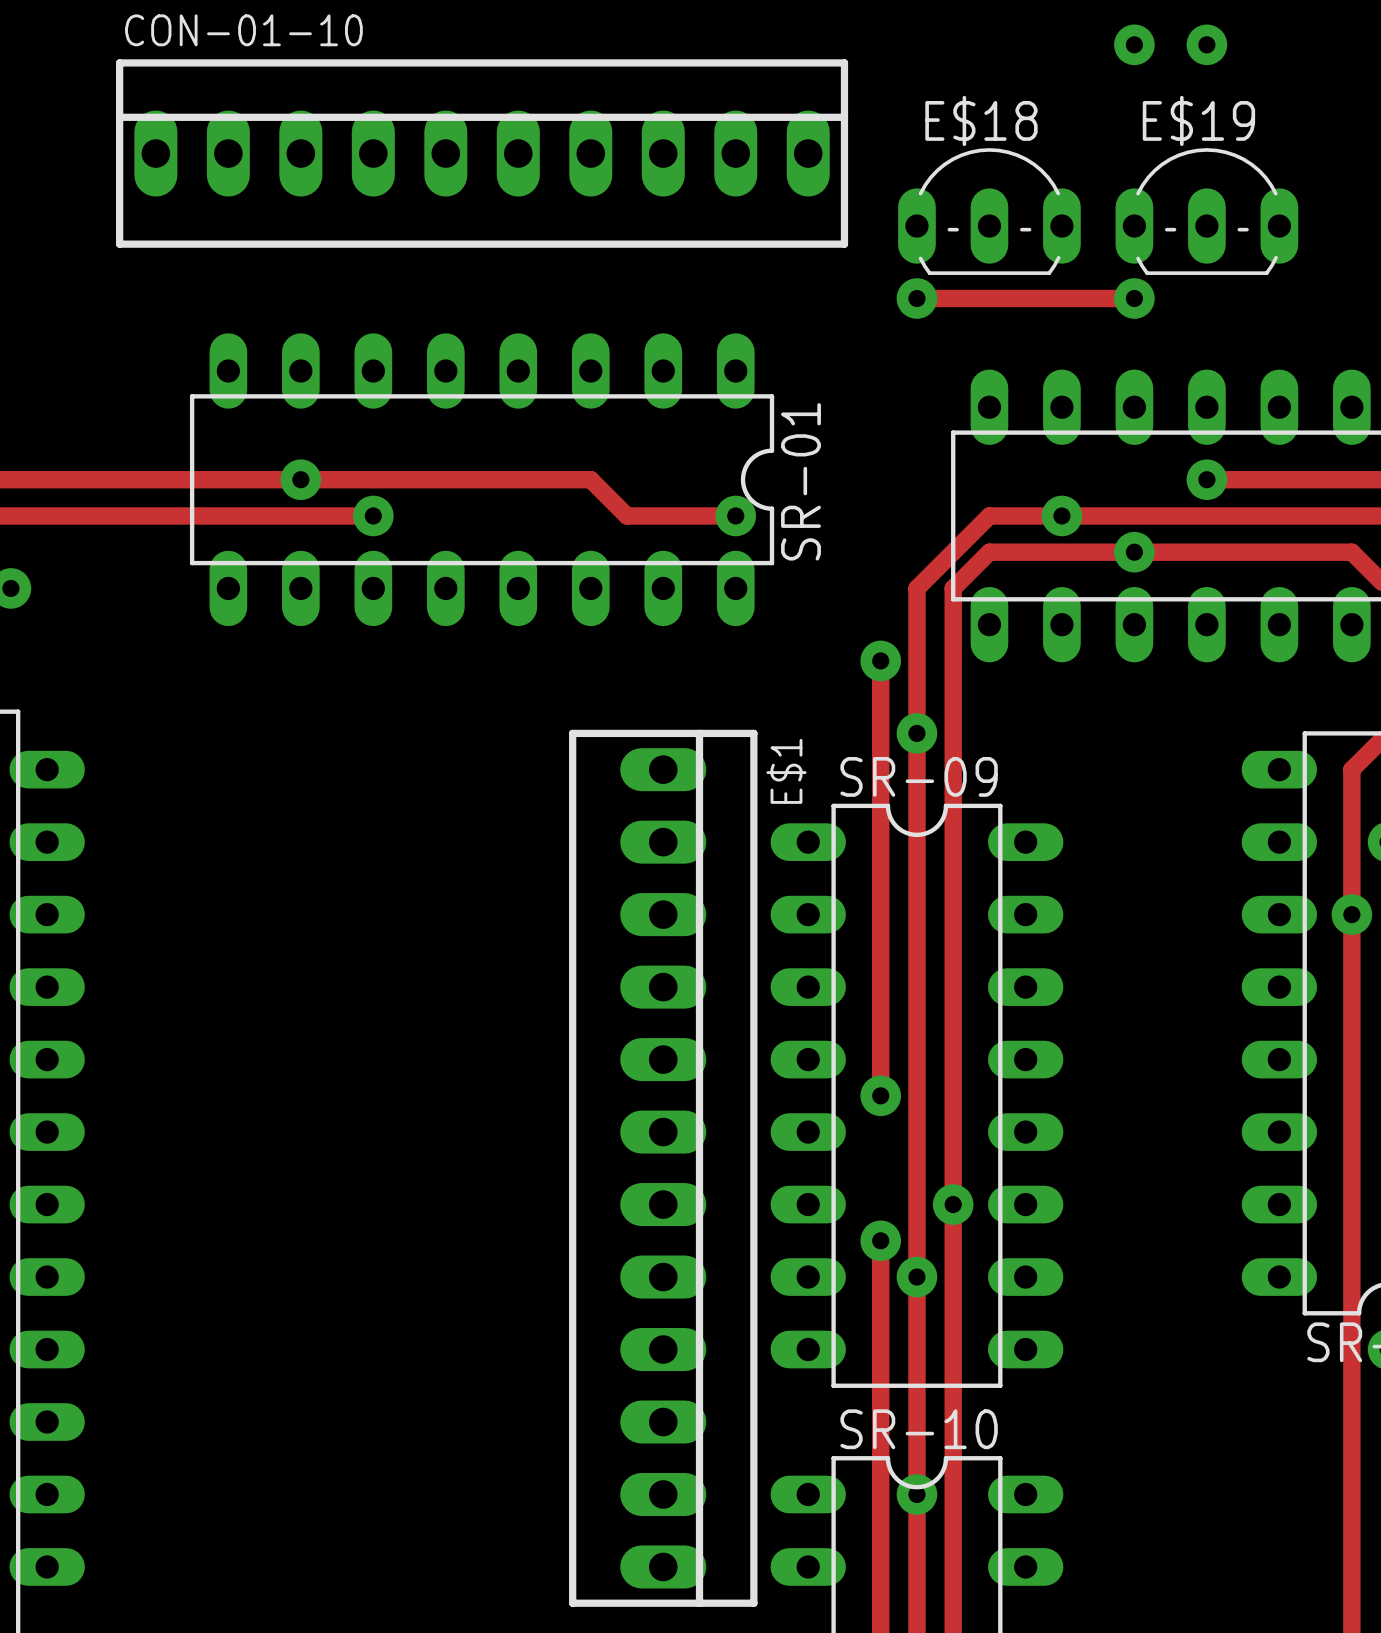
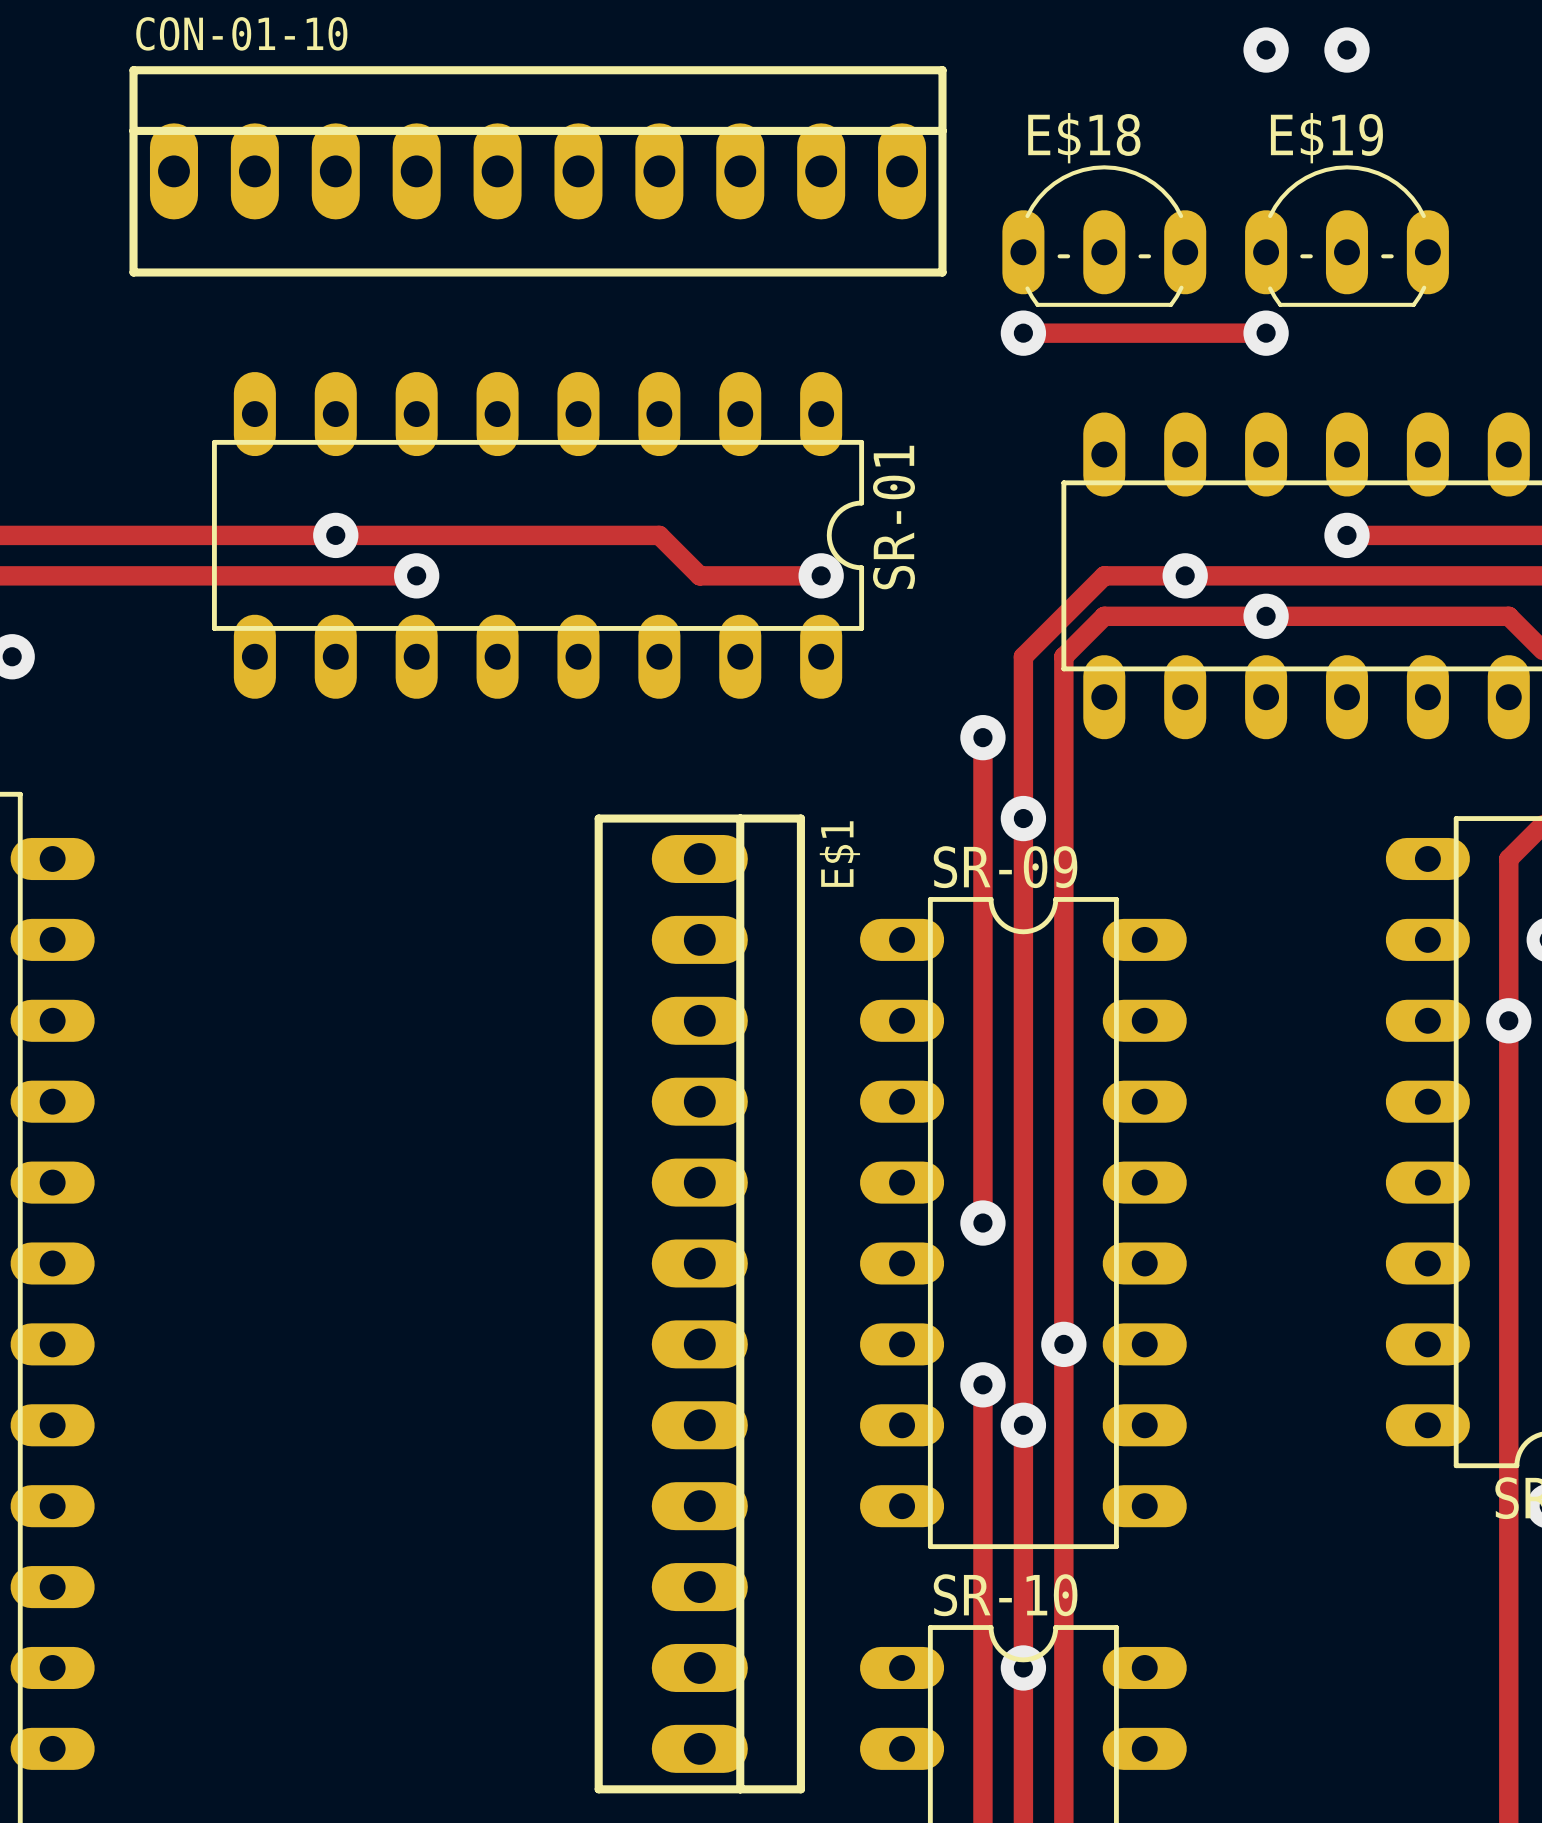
E$1 position: (663, 1168) -> (699, 1303)

